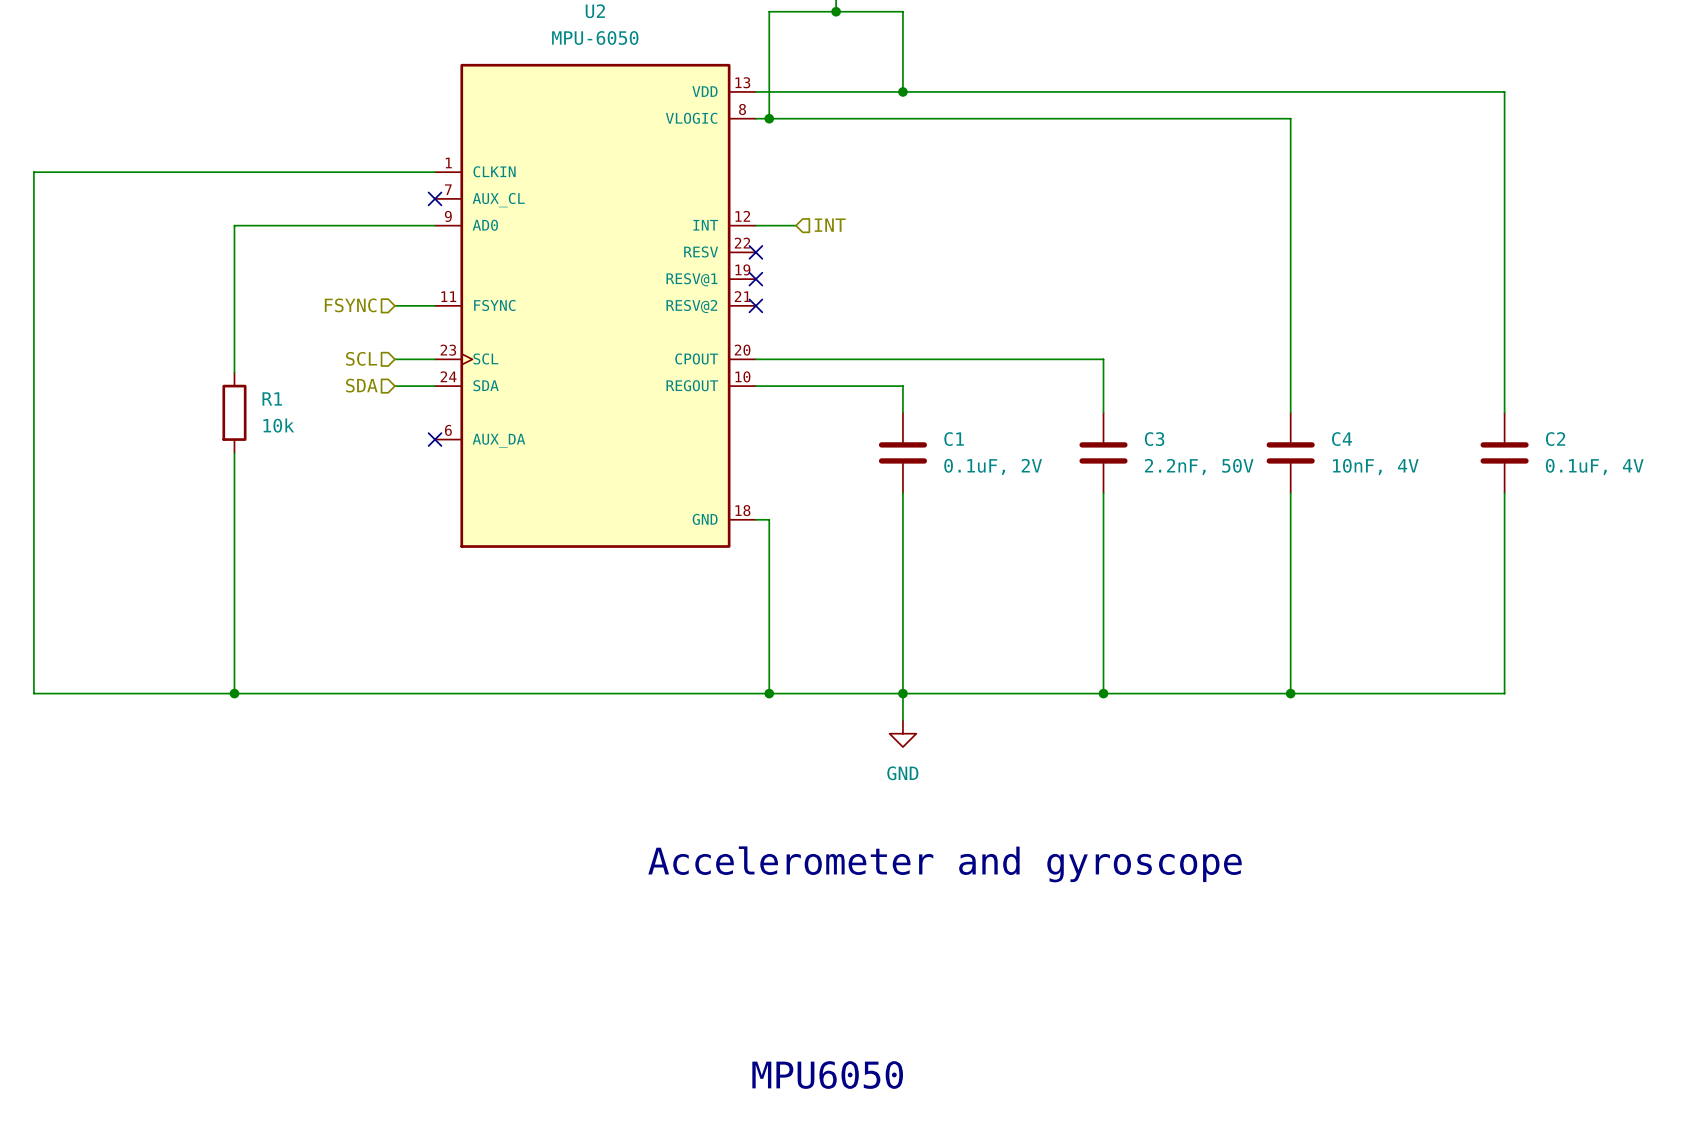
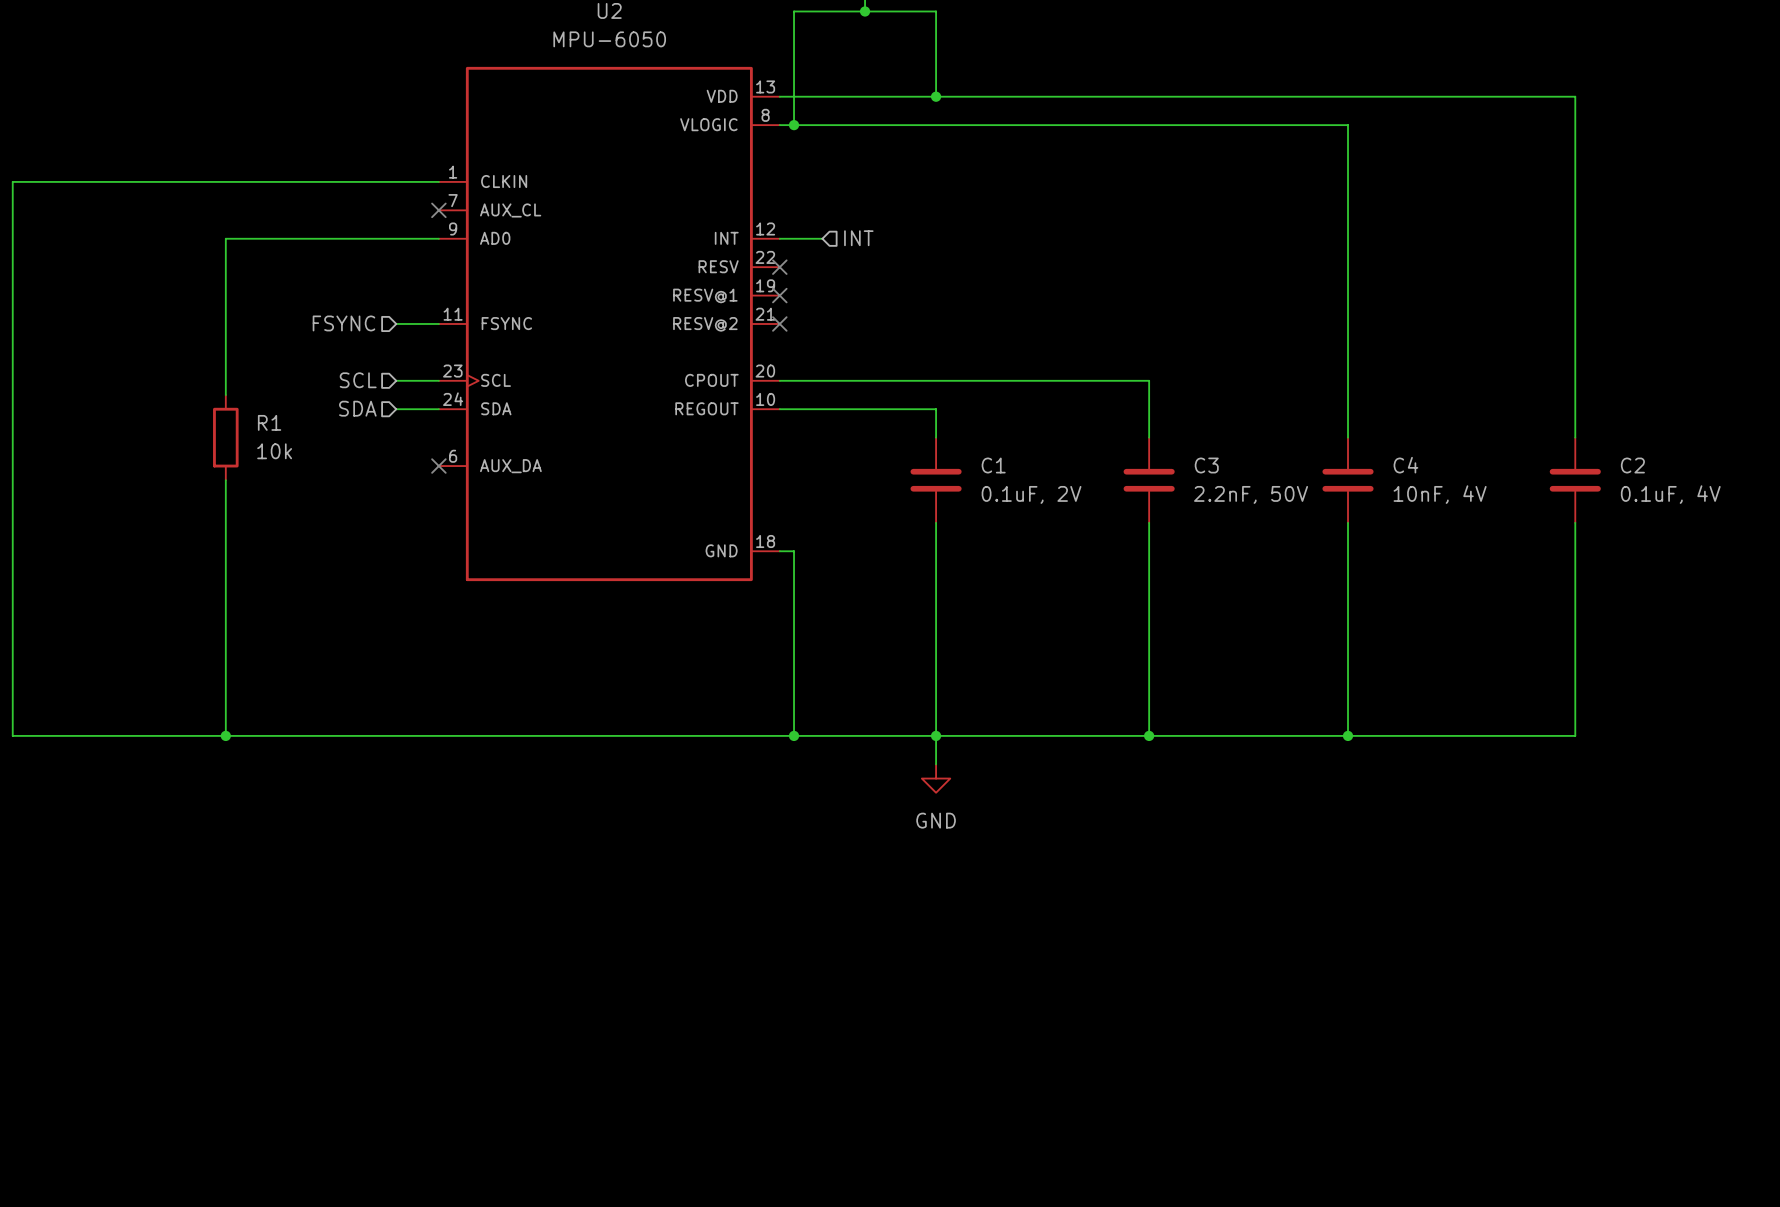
text: Accelerometer and gyroscope (944, 864) -> none
text: MPU6050 (827, 1075) -> none

